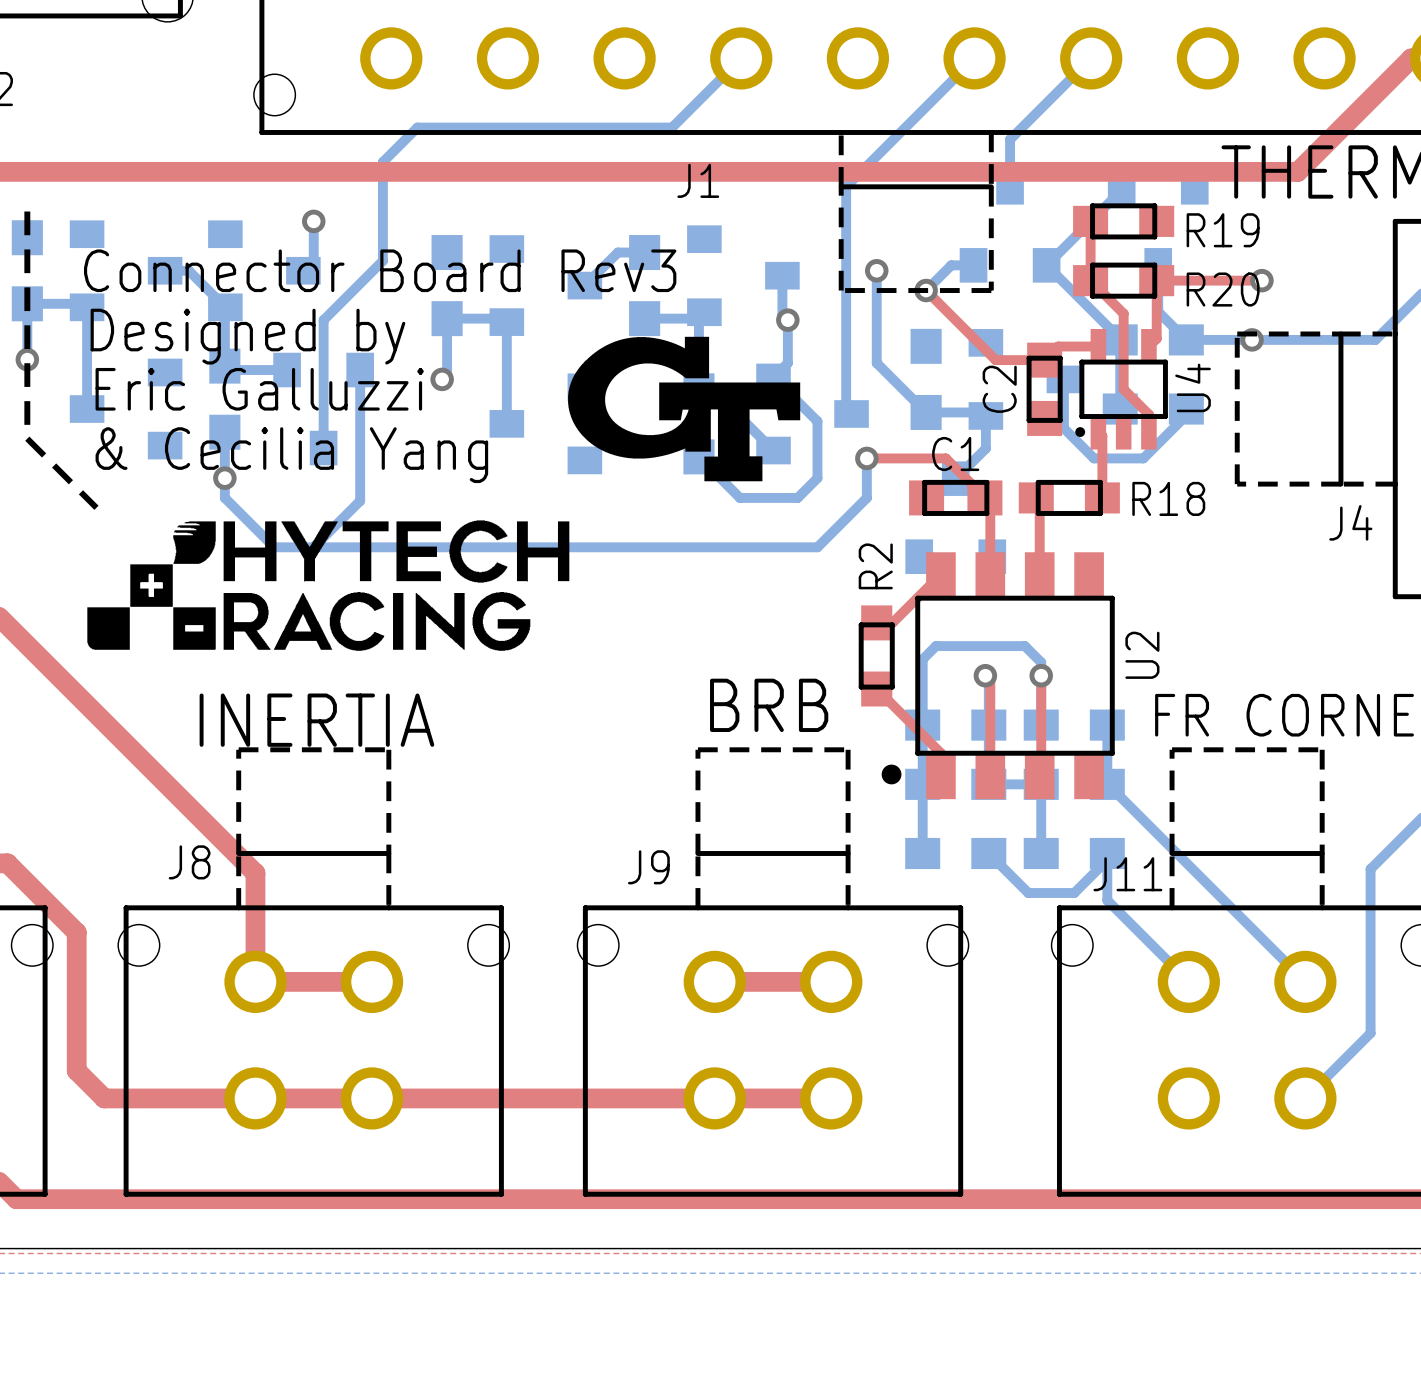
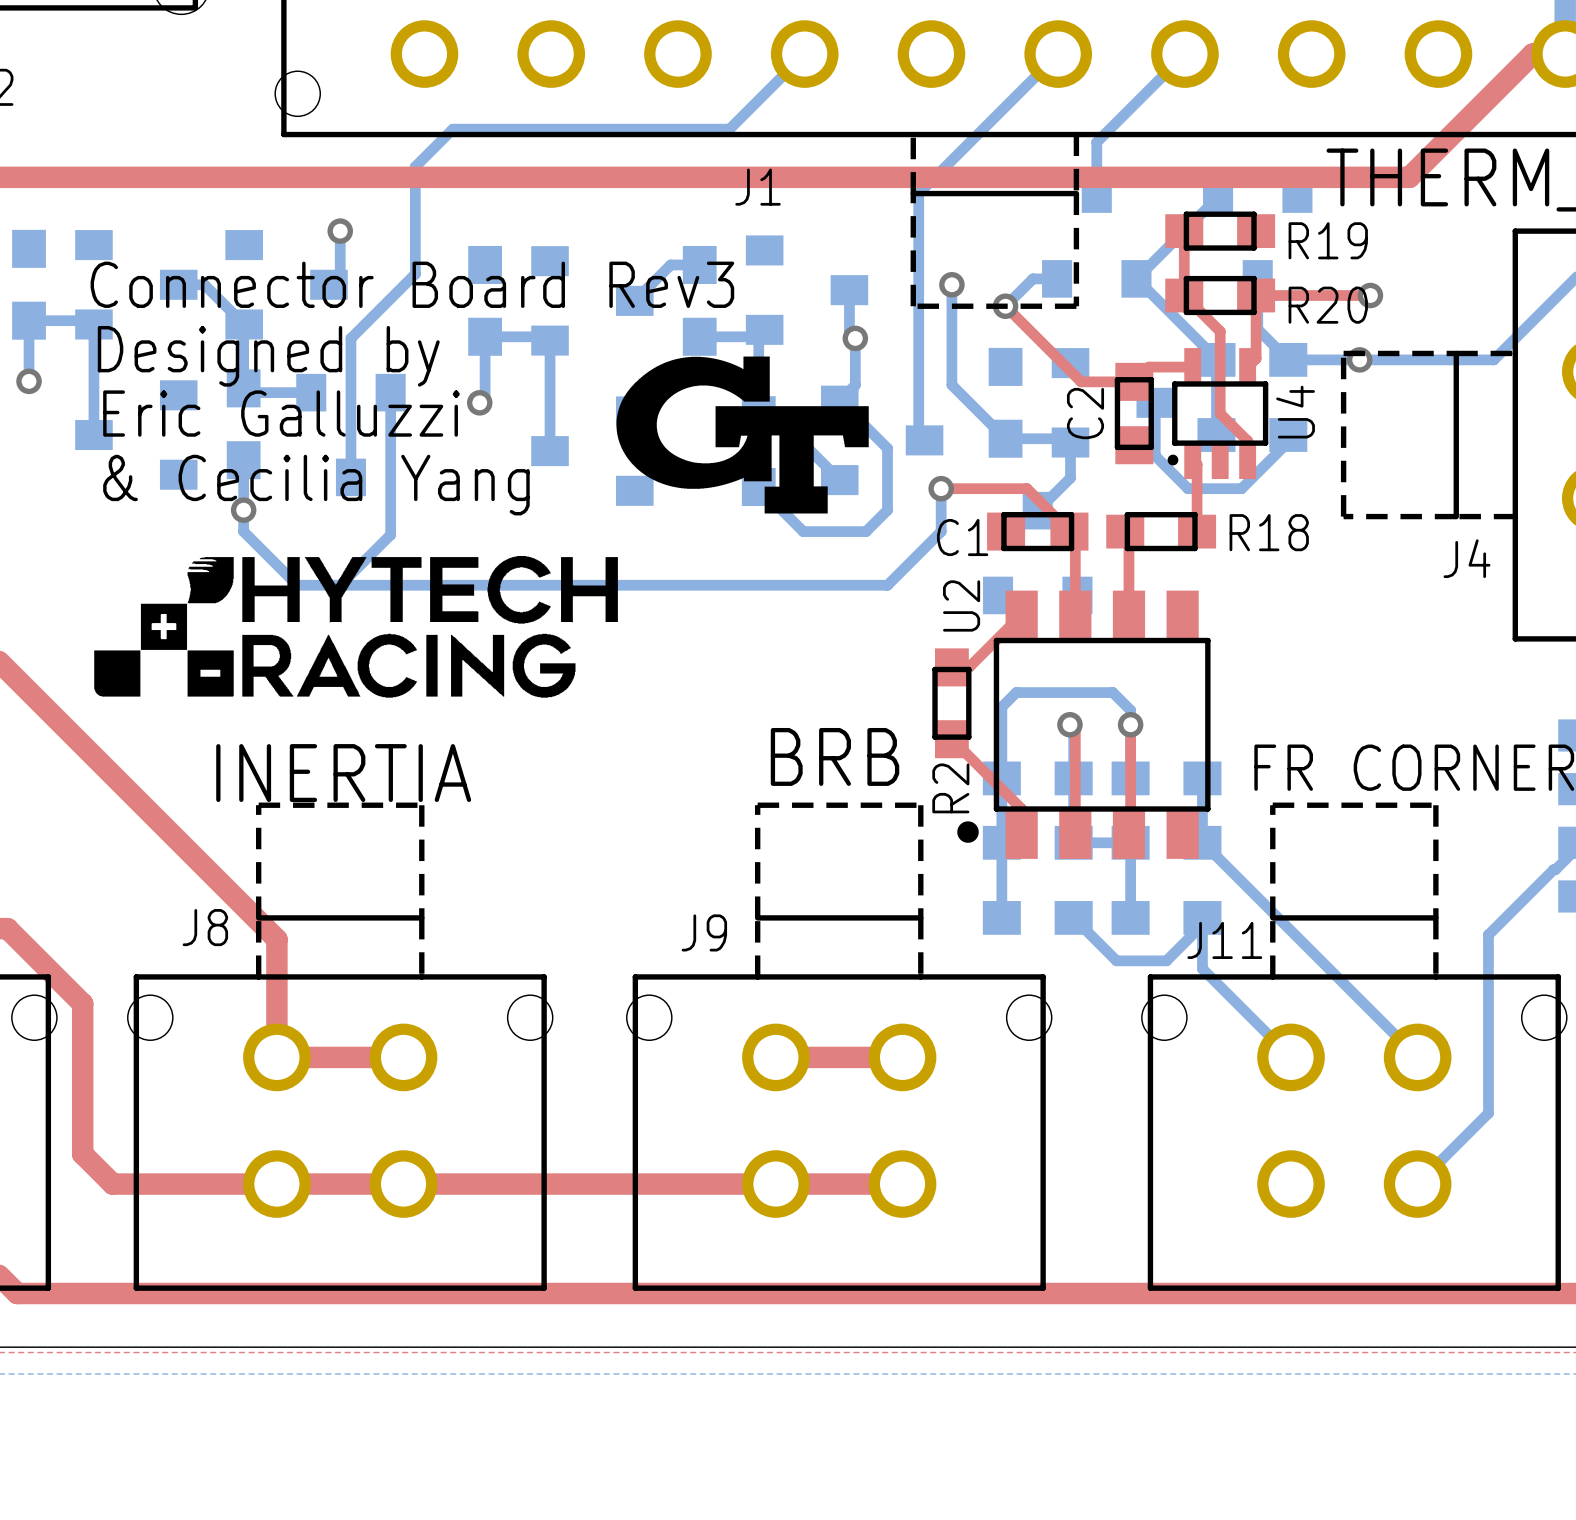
line: (27, 211) (27, 438) (96, 507) -> none
C1 name position: C1 (955, 454) -> C1 (962, 537)
R2 name position: R2 (875, 566) -> R2 (950, 788)
U2 name position: U2 (1142, 655) -> U2 (961, 605)

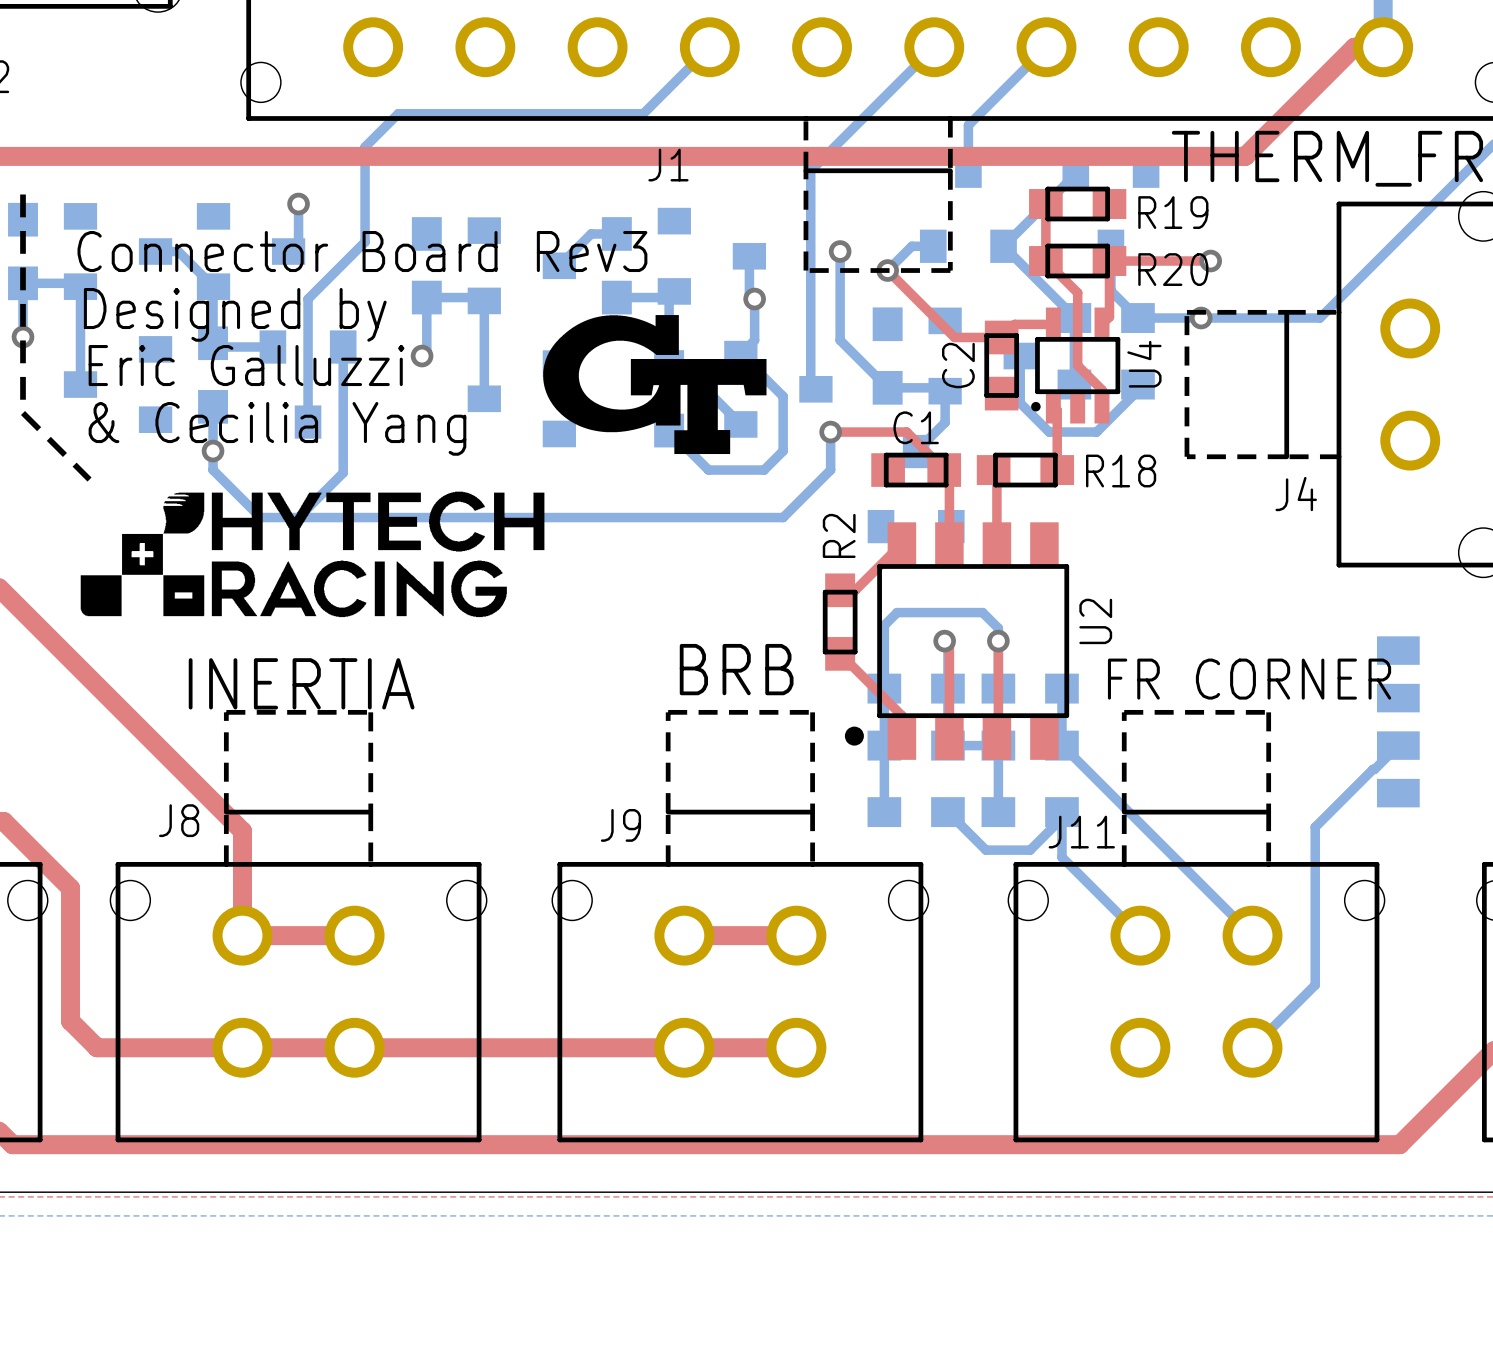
line: none -> (23, 194) (23, 413) (89, 479)
C1 name position: C1 (962, 537) -> C1 (916, 427)
U2 name position: U2 (961, 605) -> U2 (1095, 621)
R2 name position: R2 (950, 788) -> R2 (839, 535)

